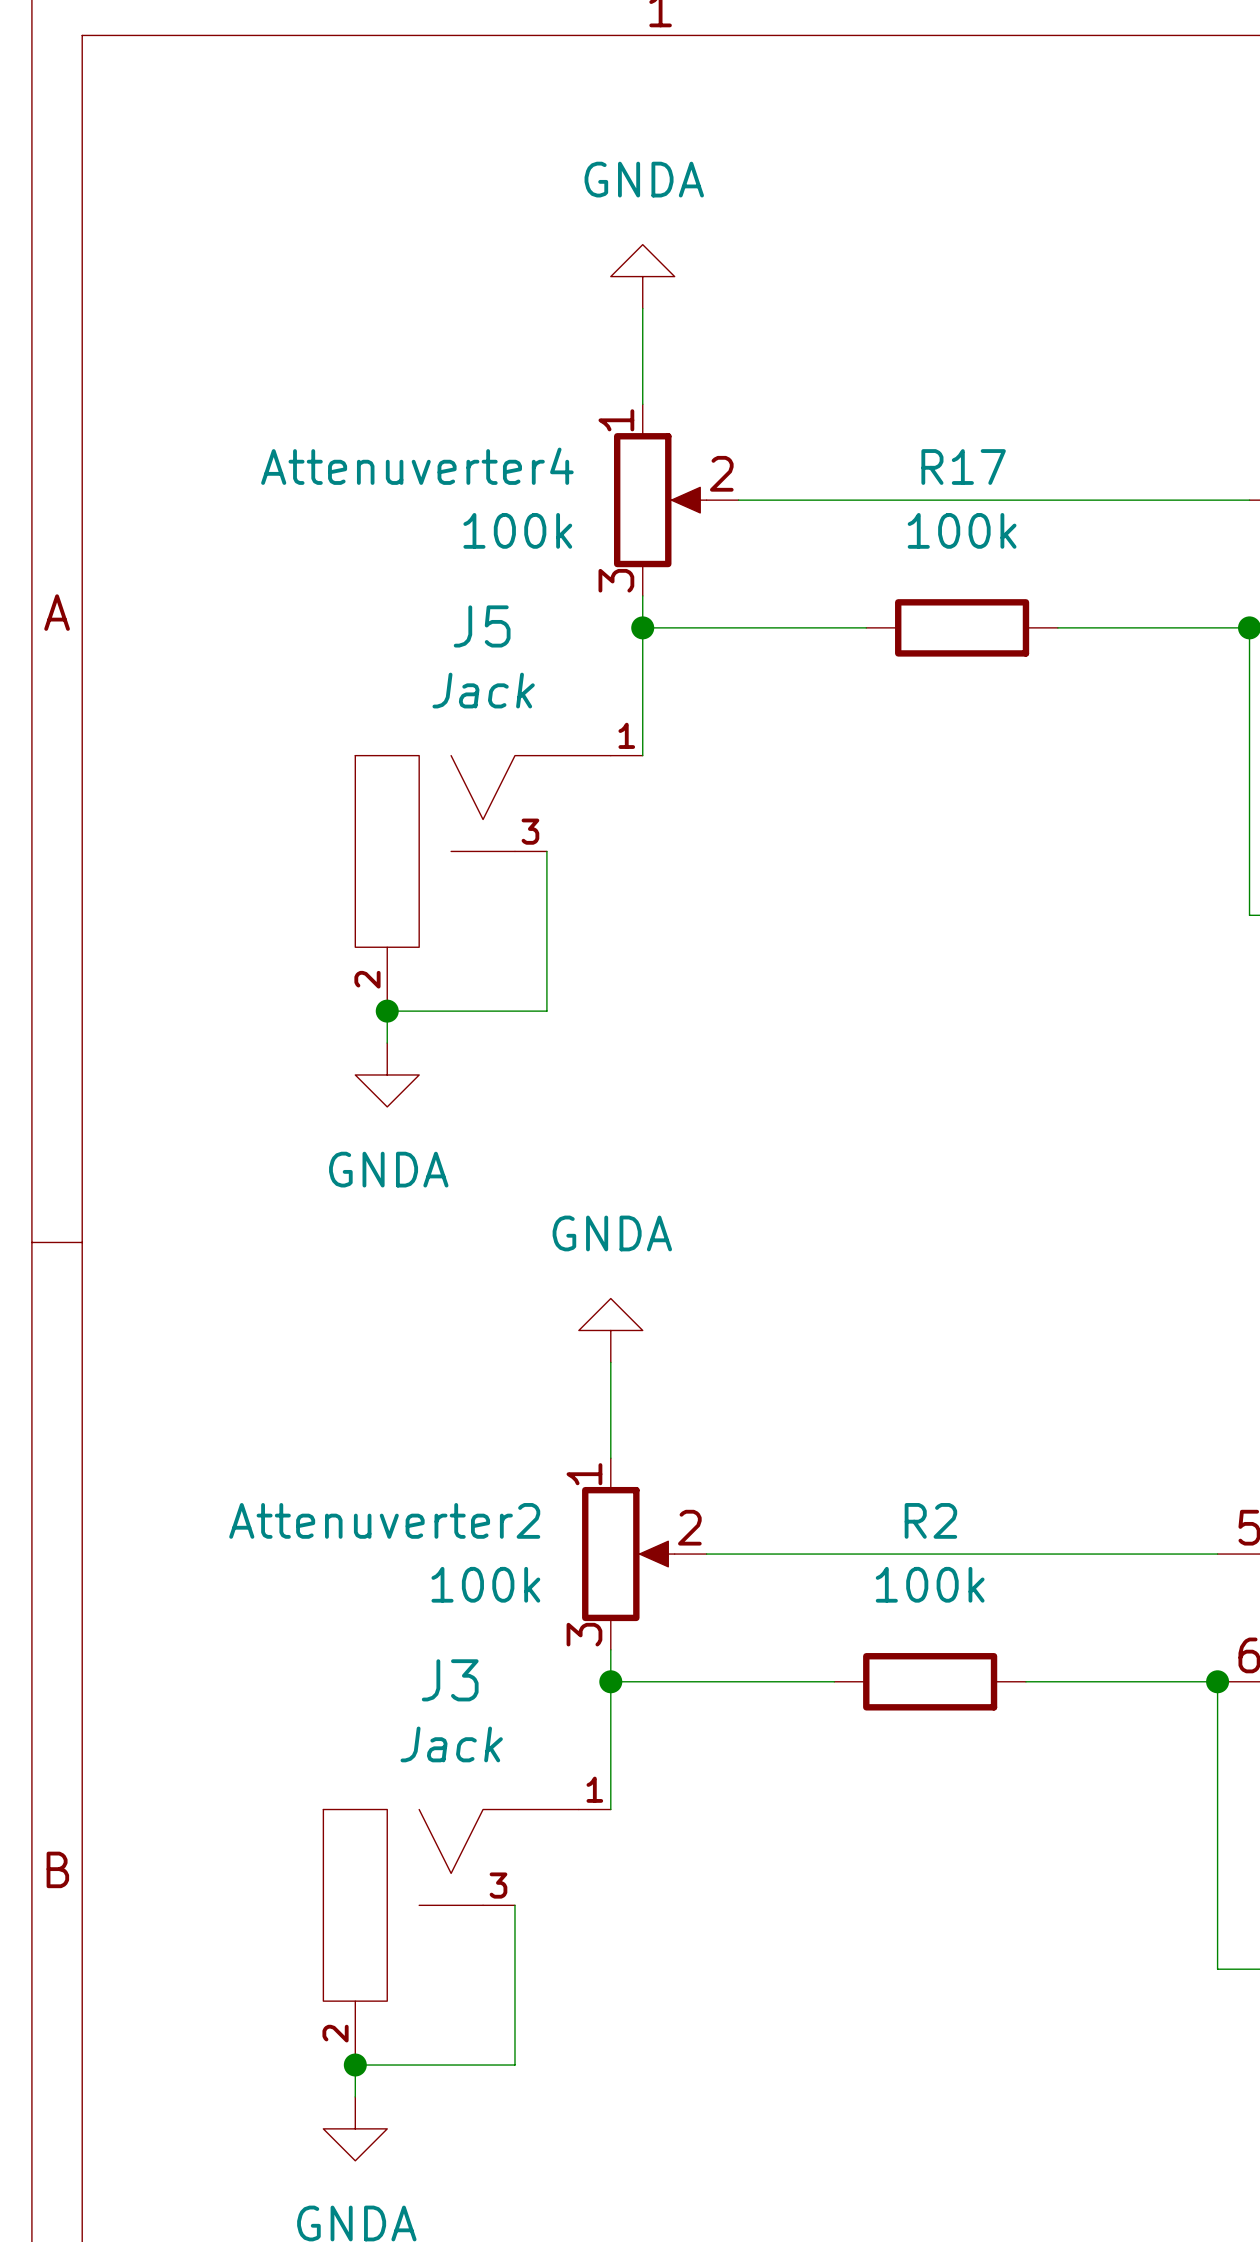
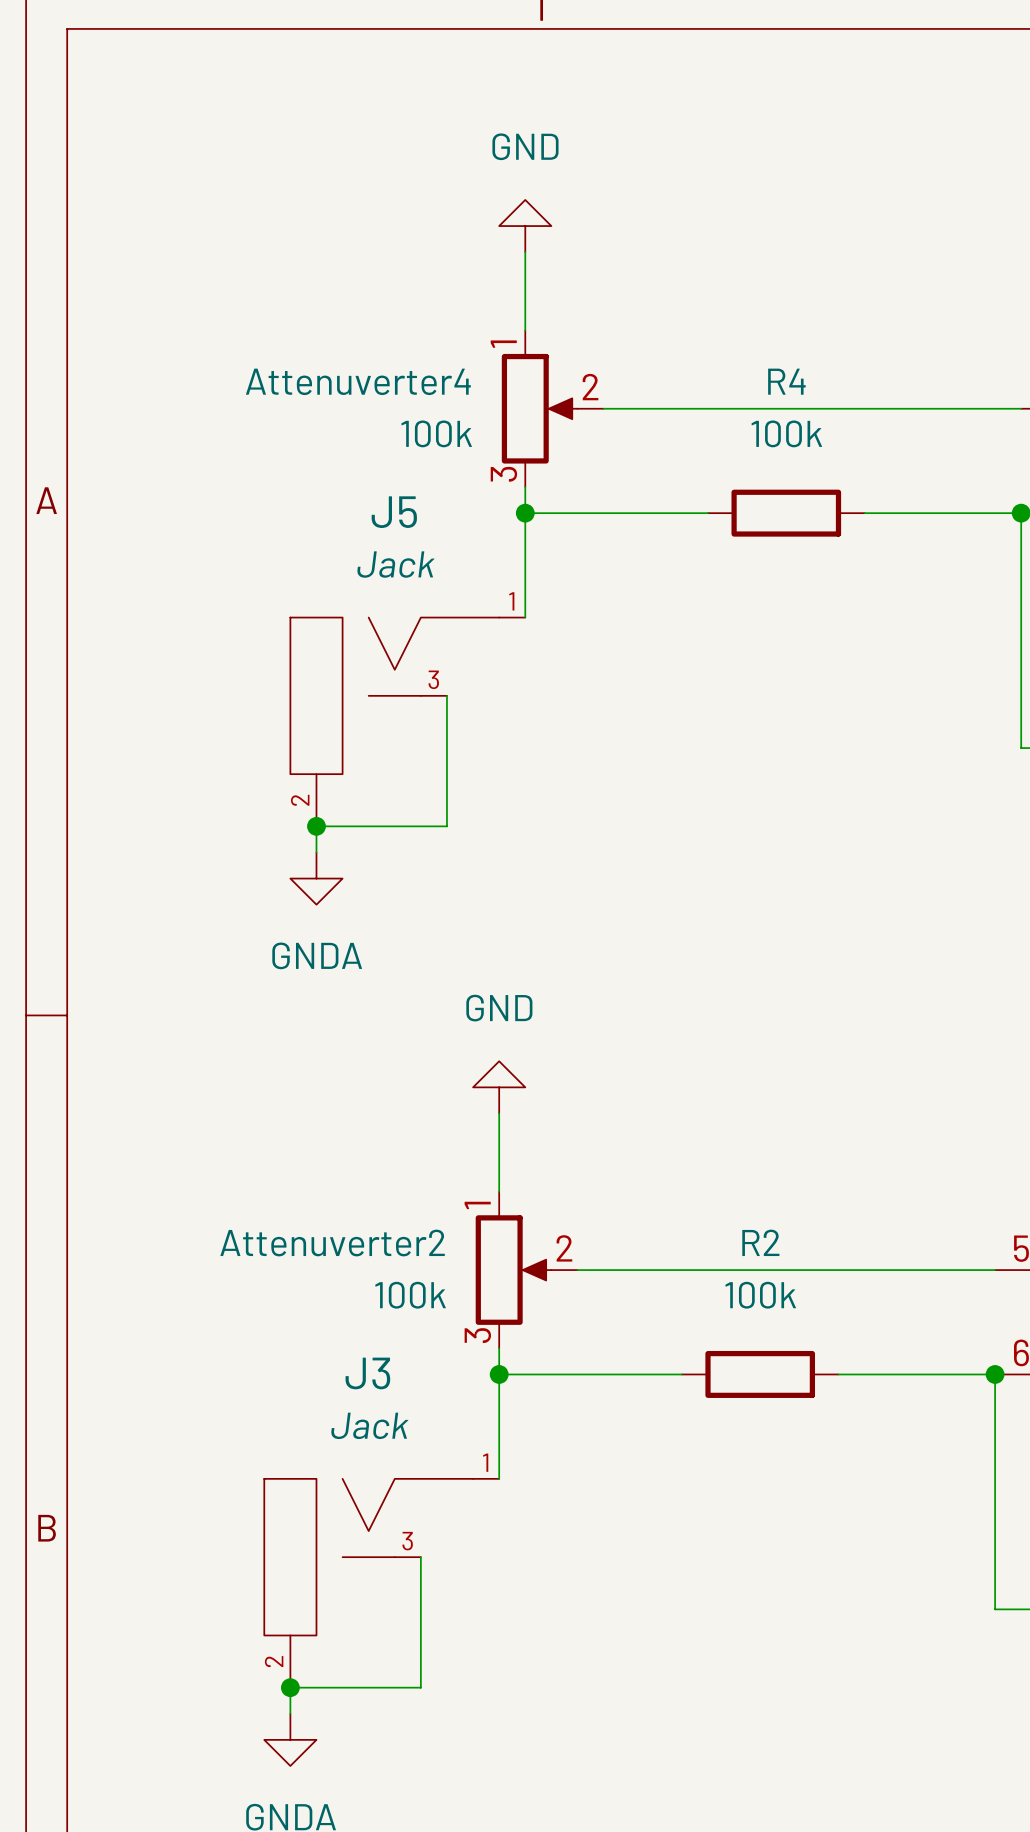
power symbol: GNDA (642, 276) -> GND (525, 226)
R17 name: R17 (963, 467) -> R4 (786, 381)
power symbol: GNDA (610, 1330) -> GND (499, 1087)

